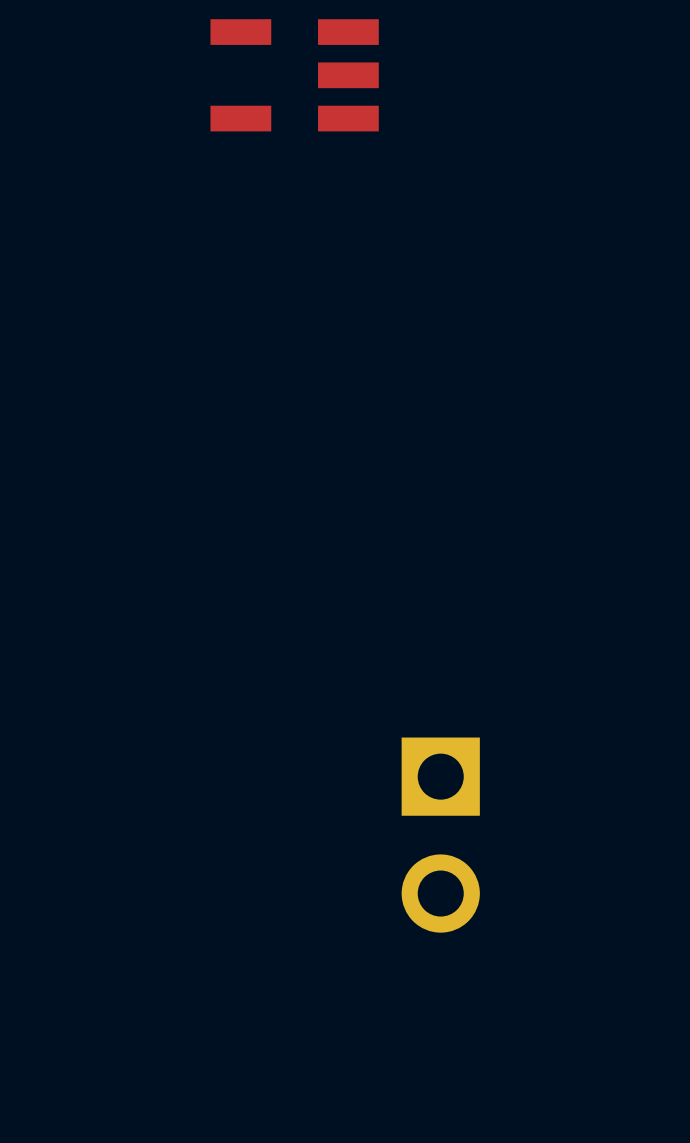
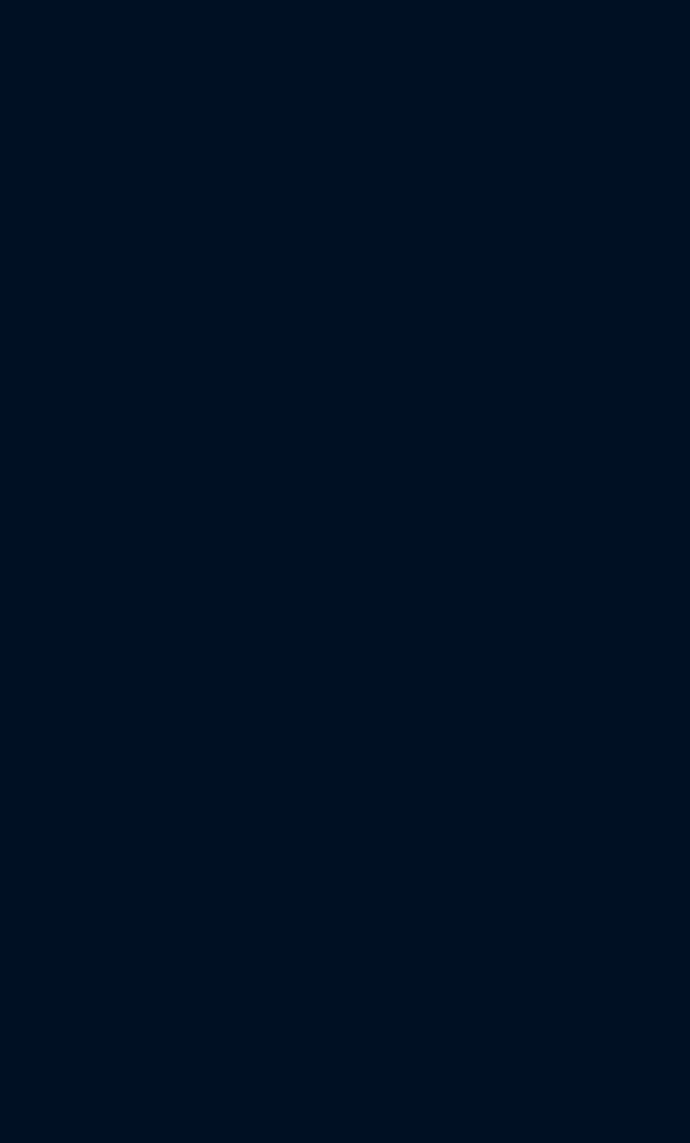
part: (294, 75) -> none
part: (440, 835) -> none

